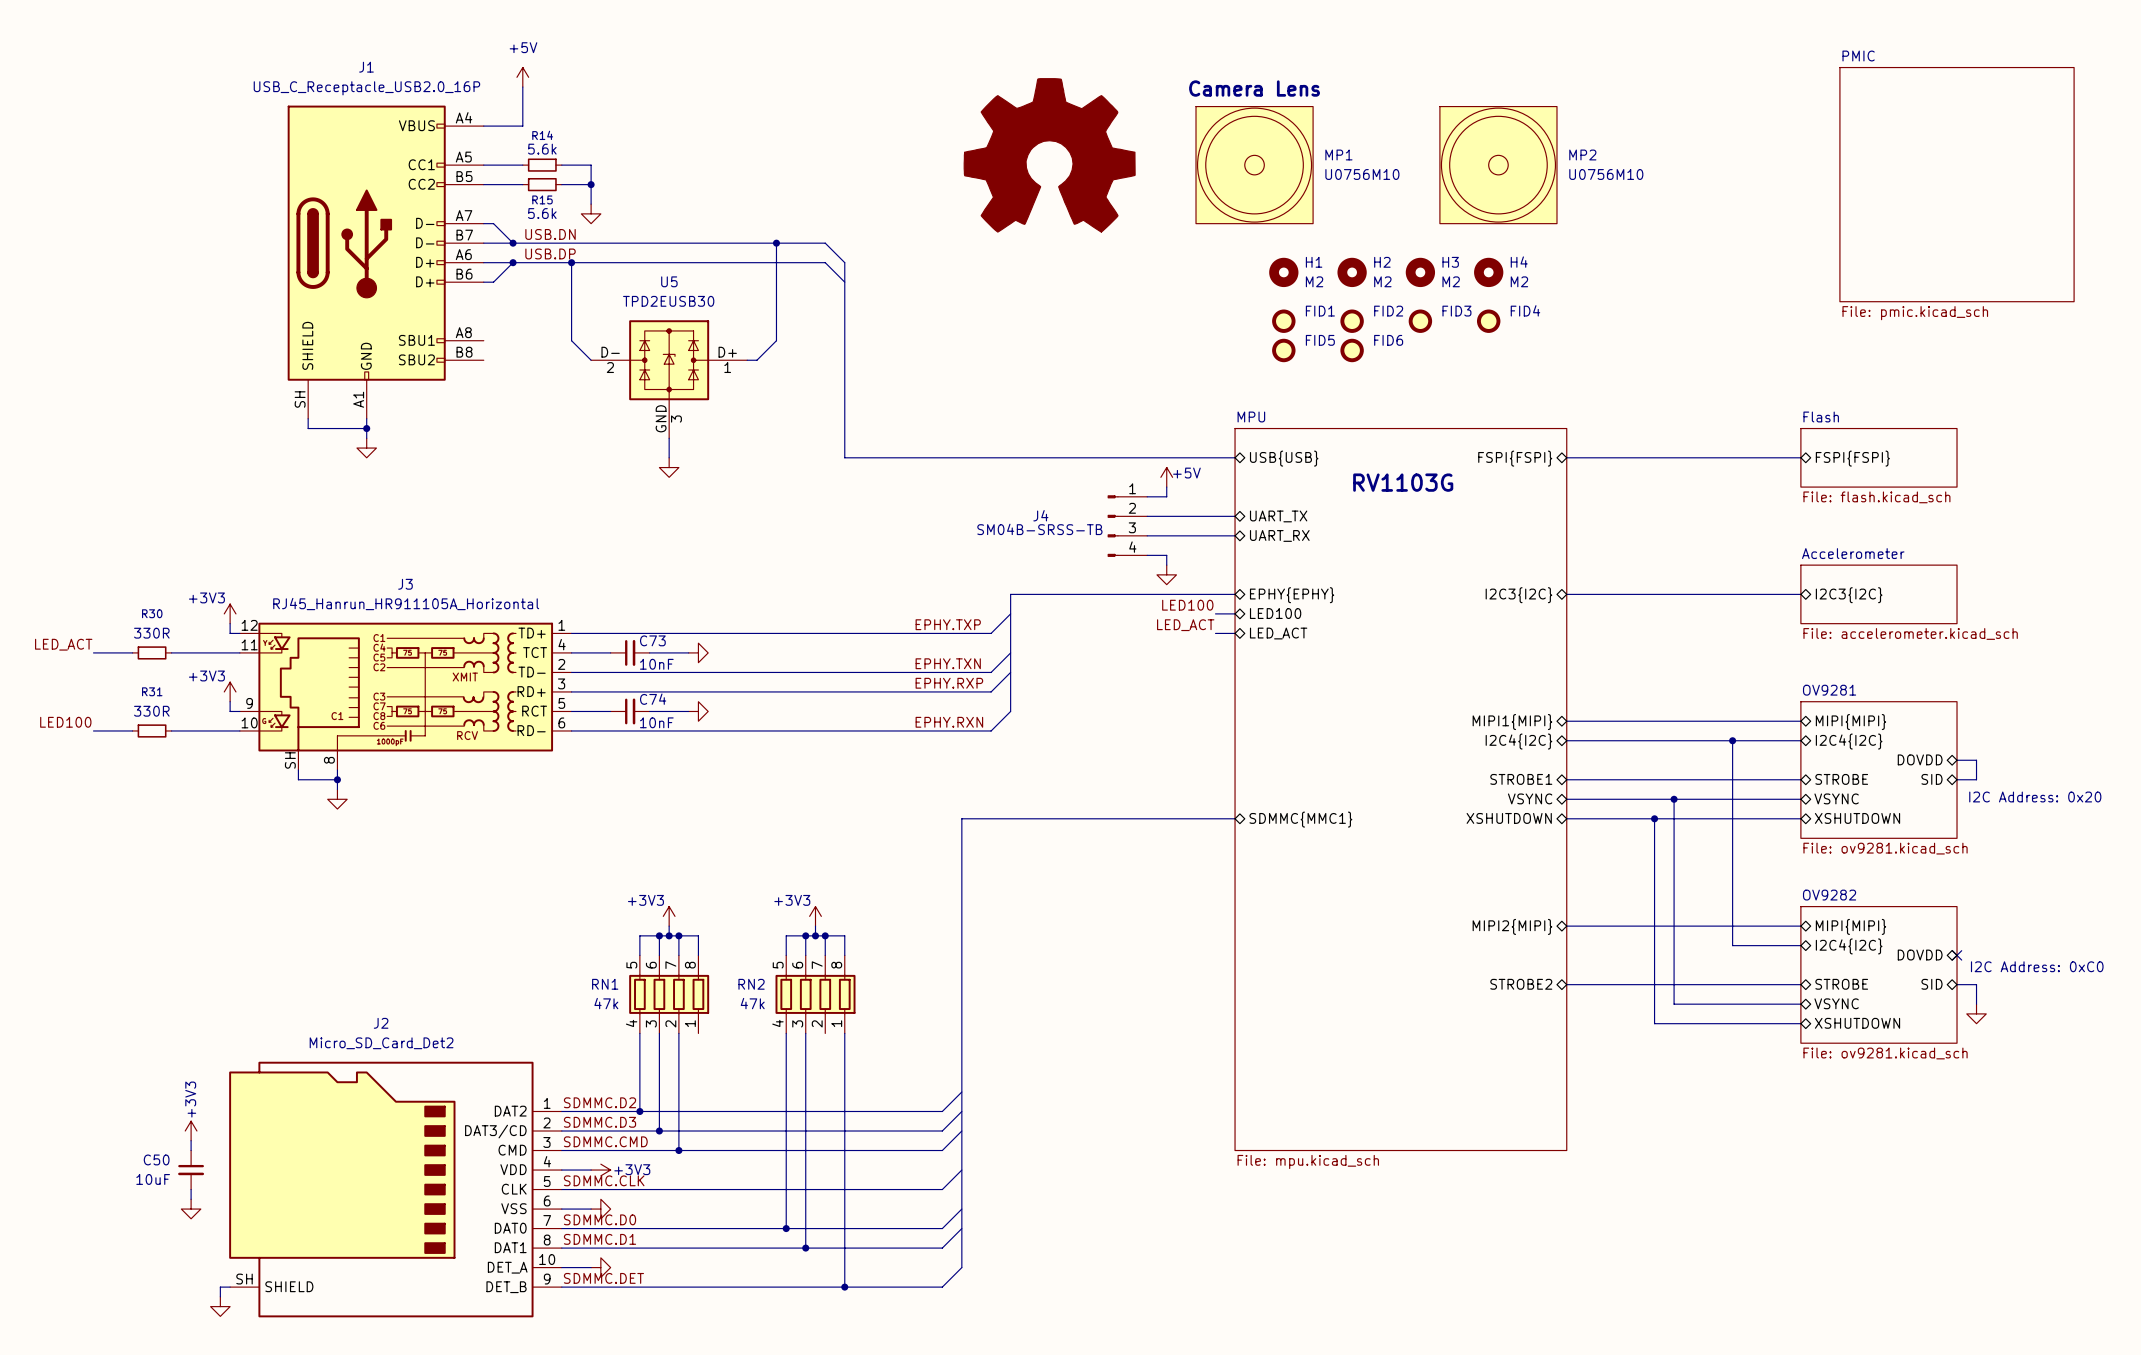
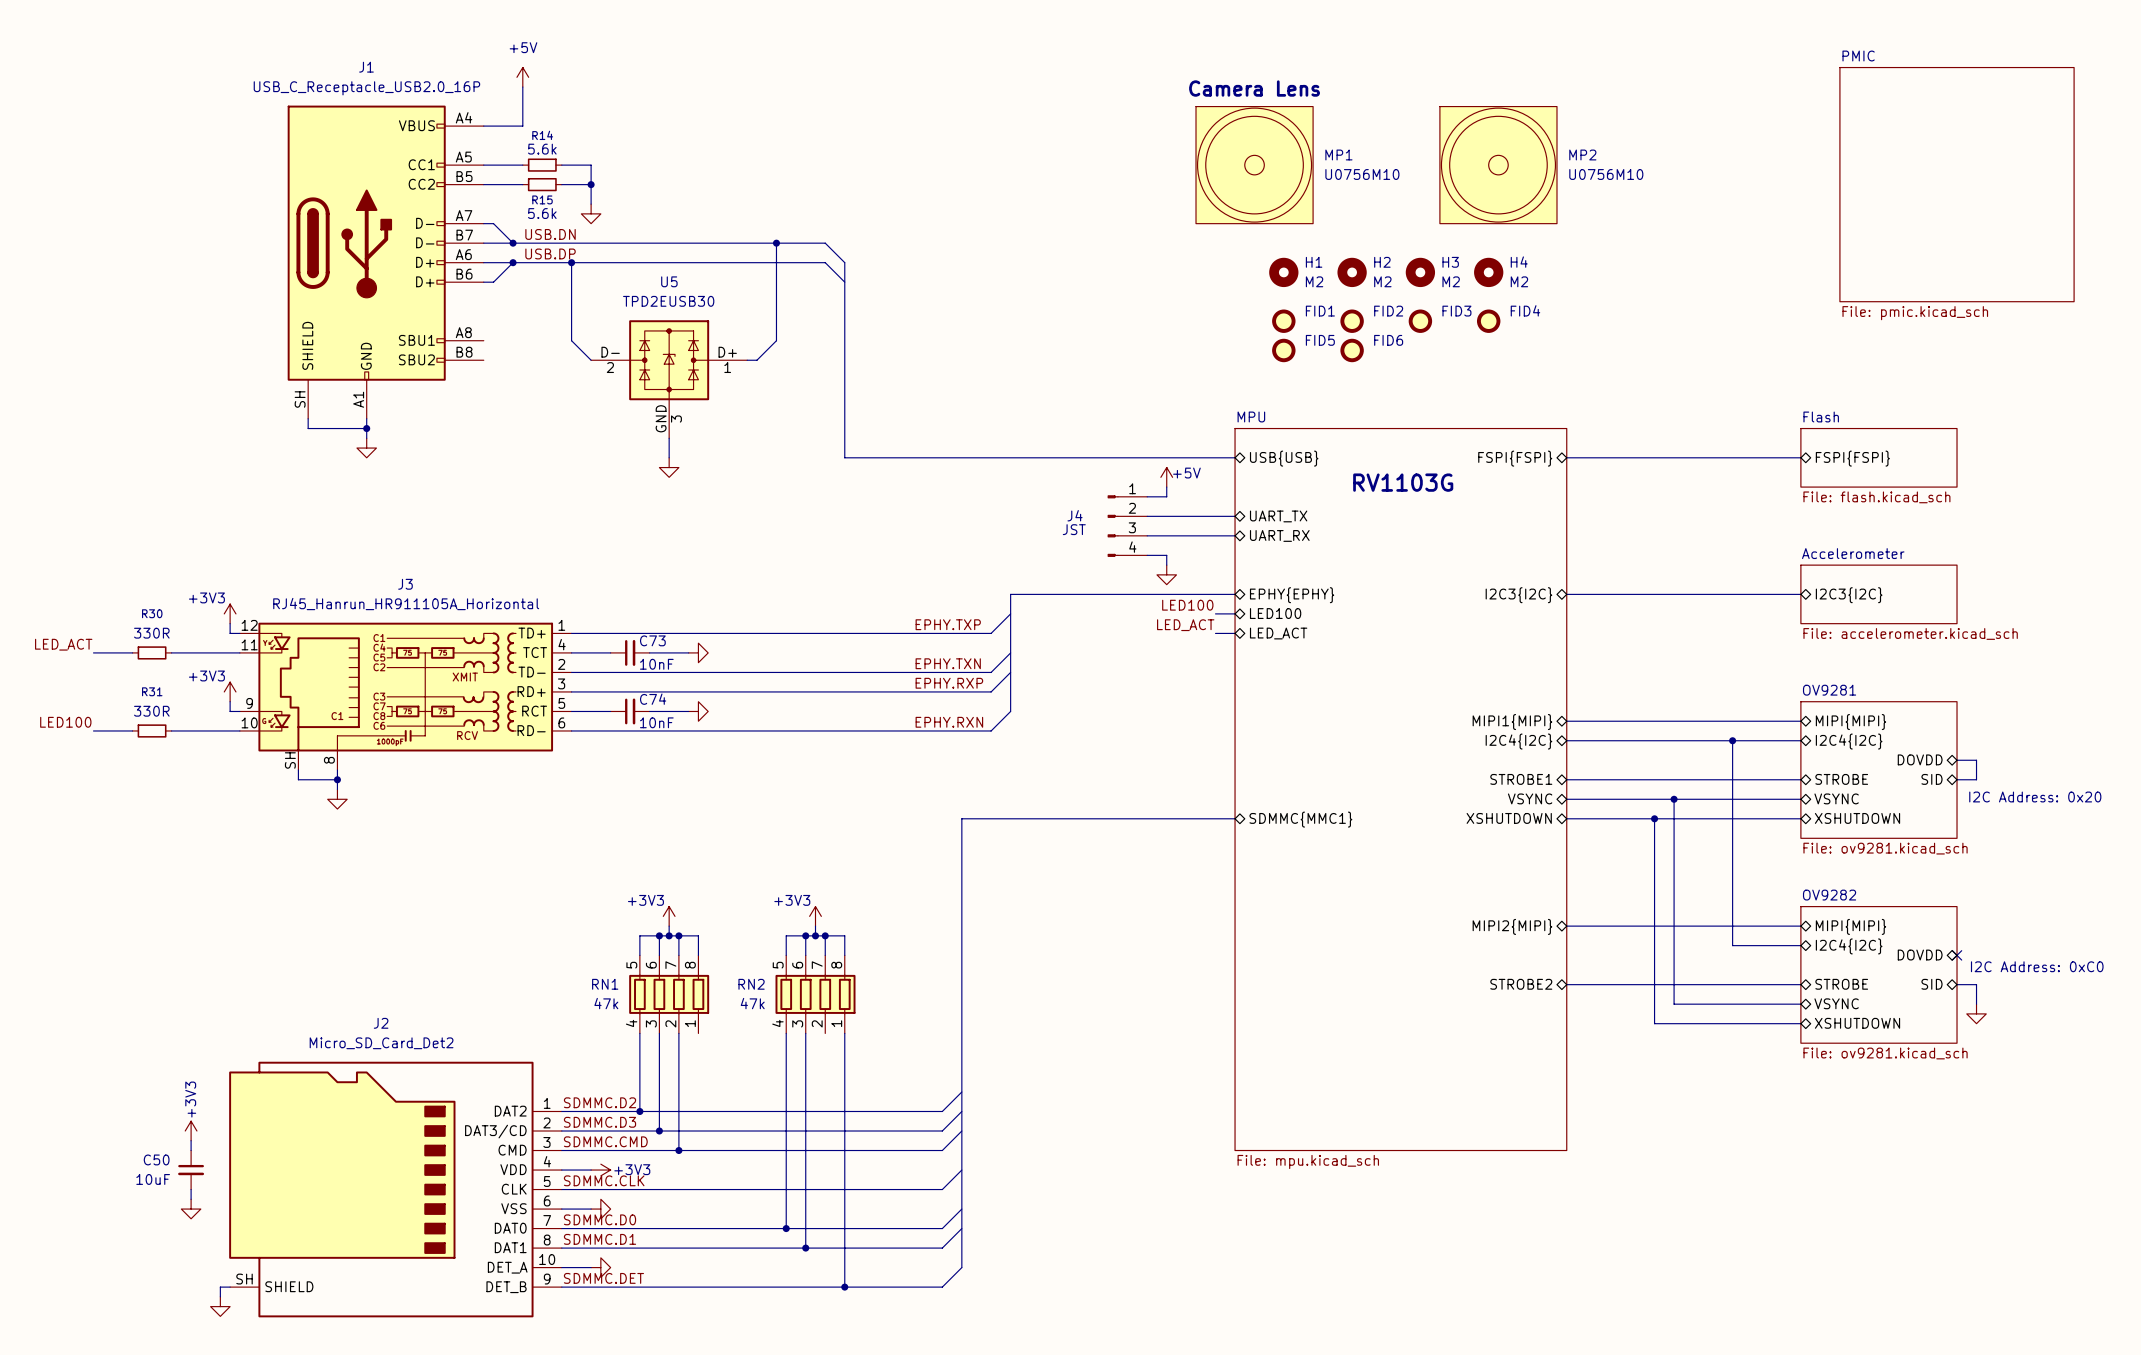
part: (1049, 155) -> none
J4 name position: J4 (1040, 515) -> J4 (1075, 515)
J4 value: SM04B-SRSS-TB (1039, 529) -> JST (1074, 529)

